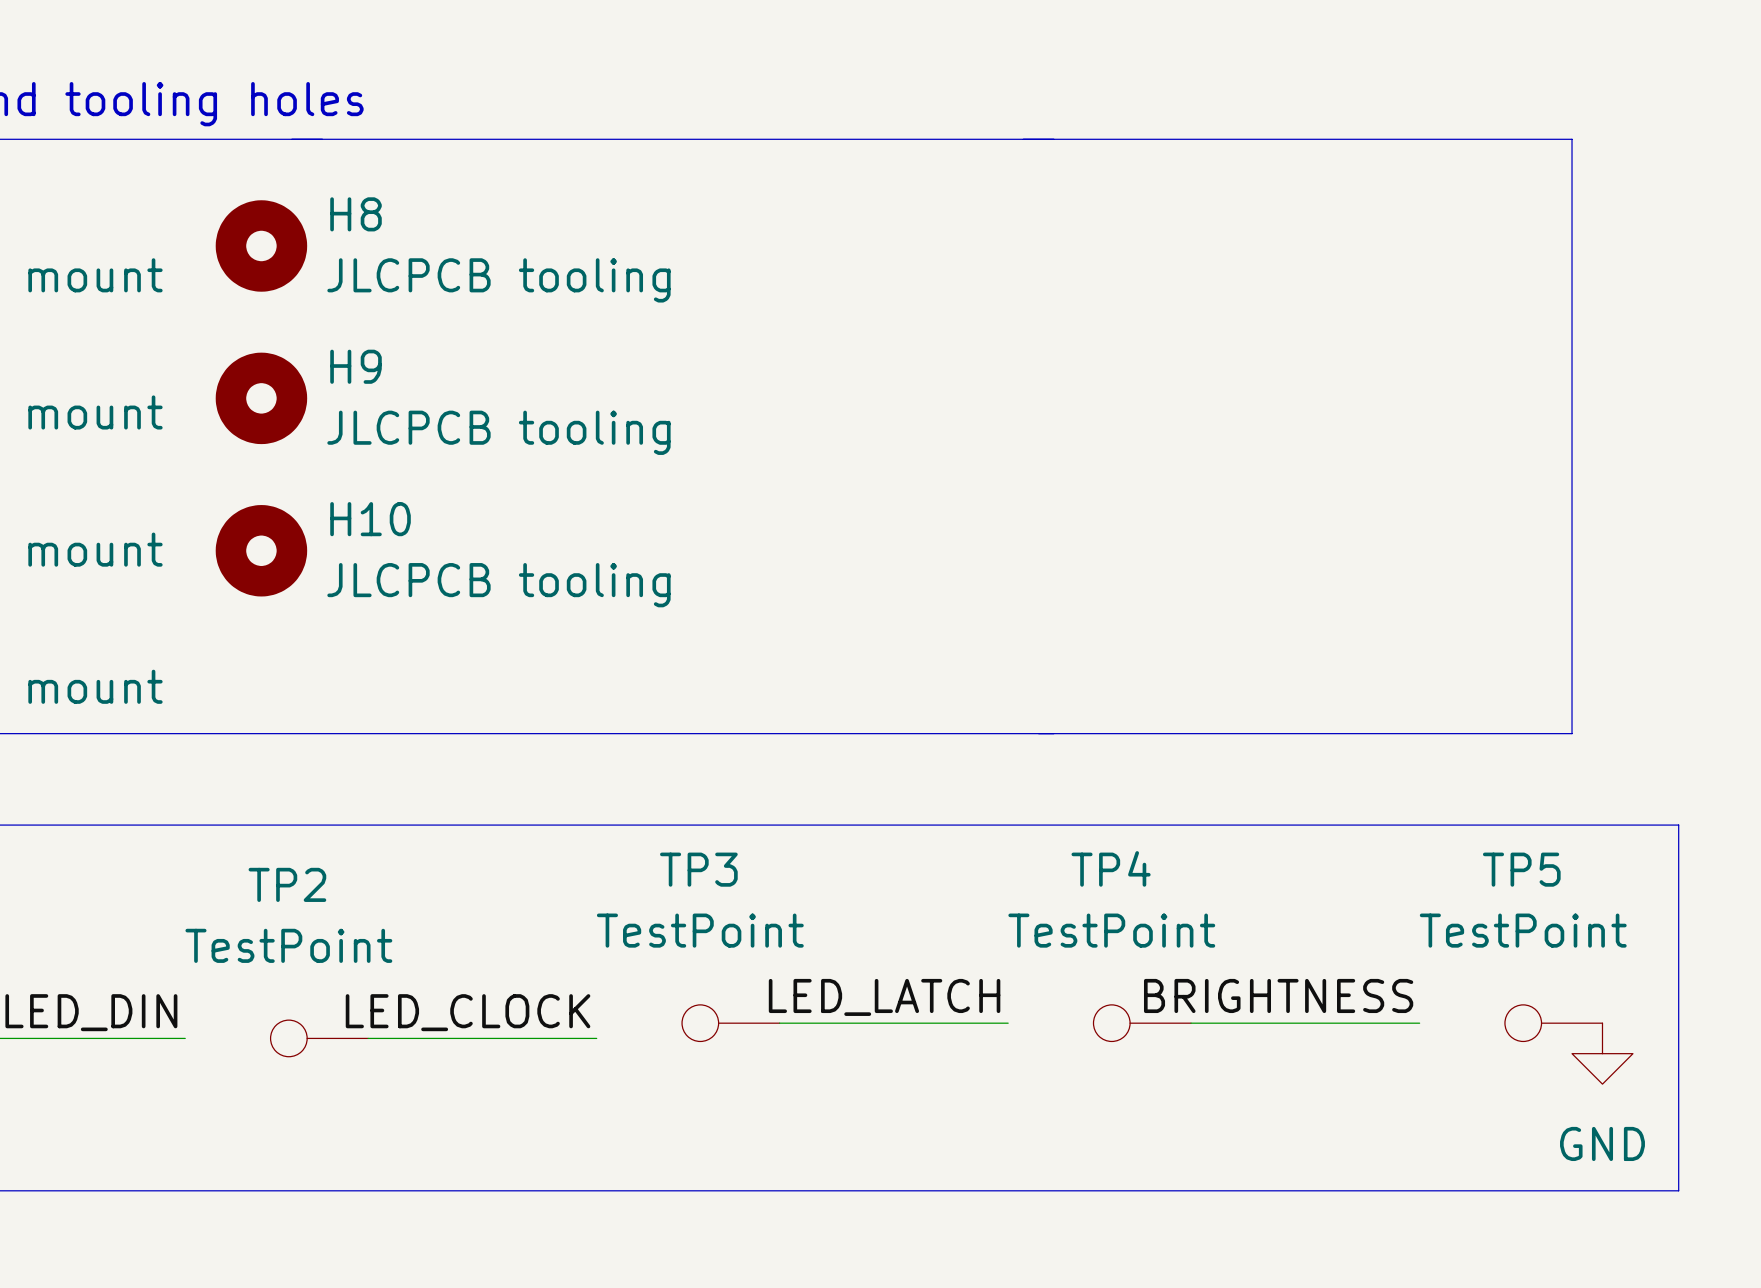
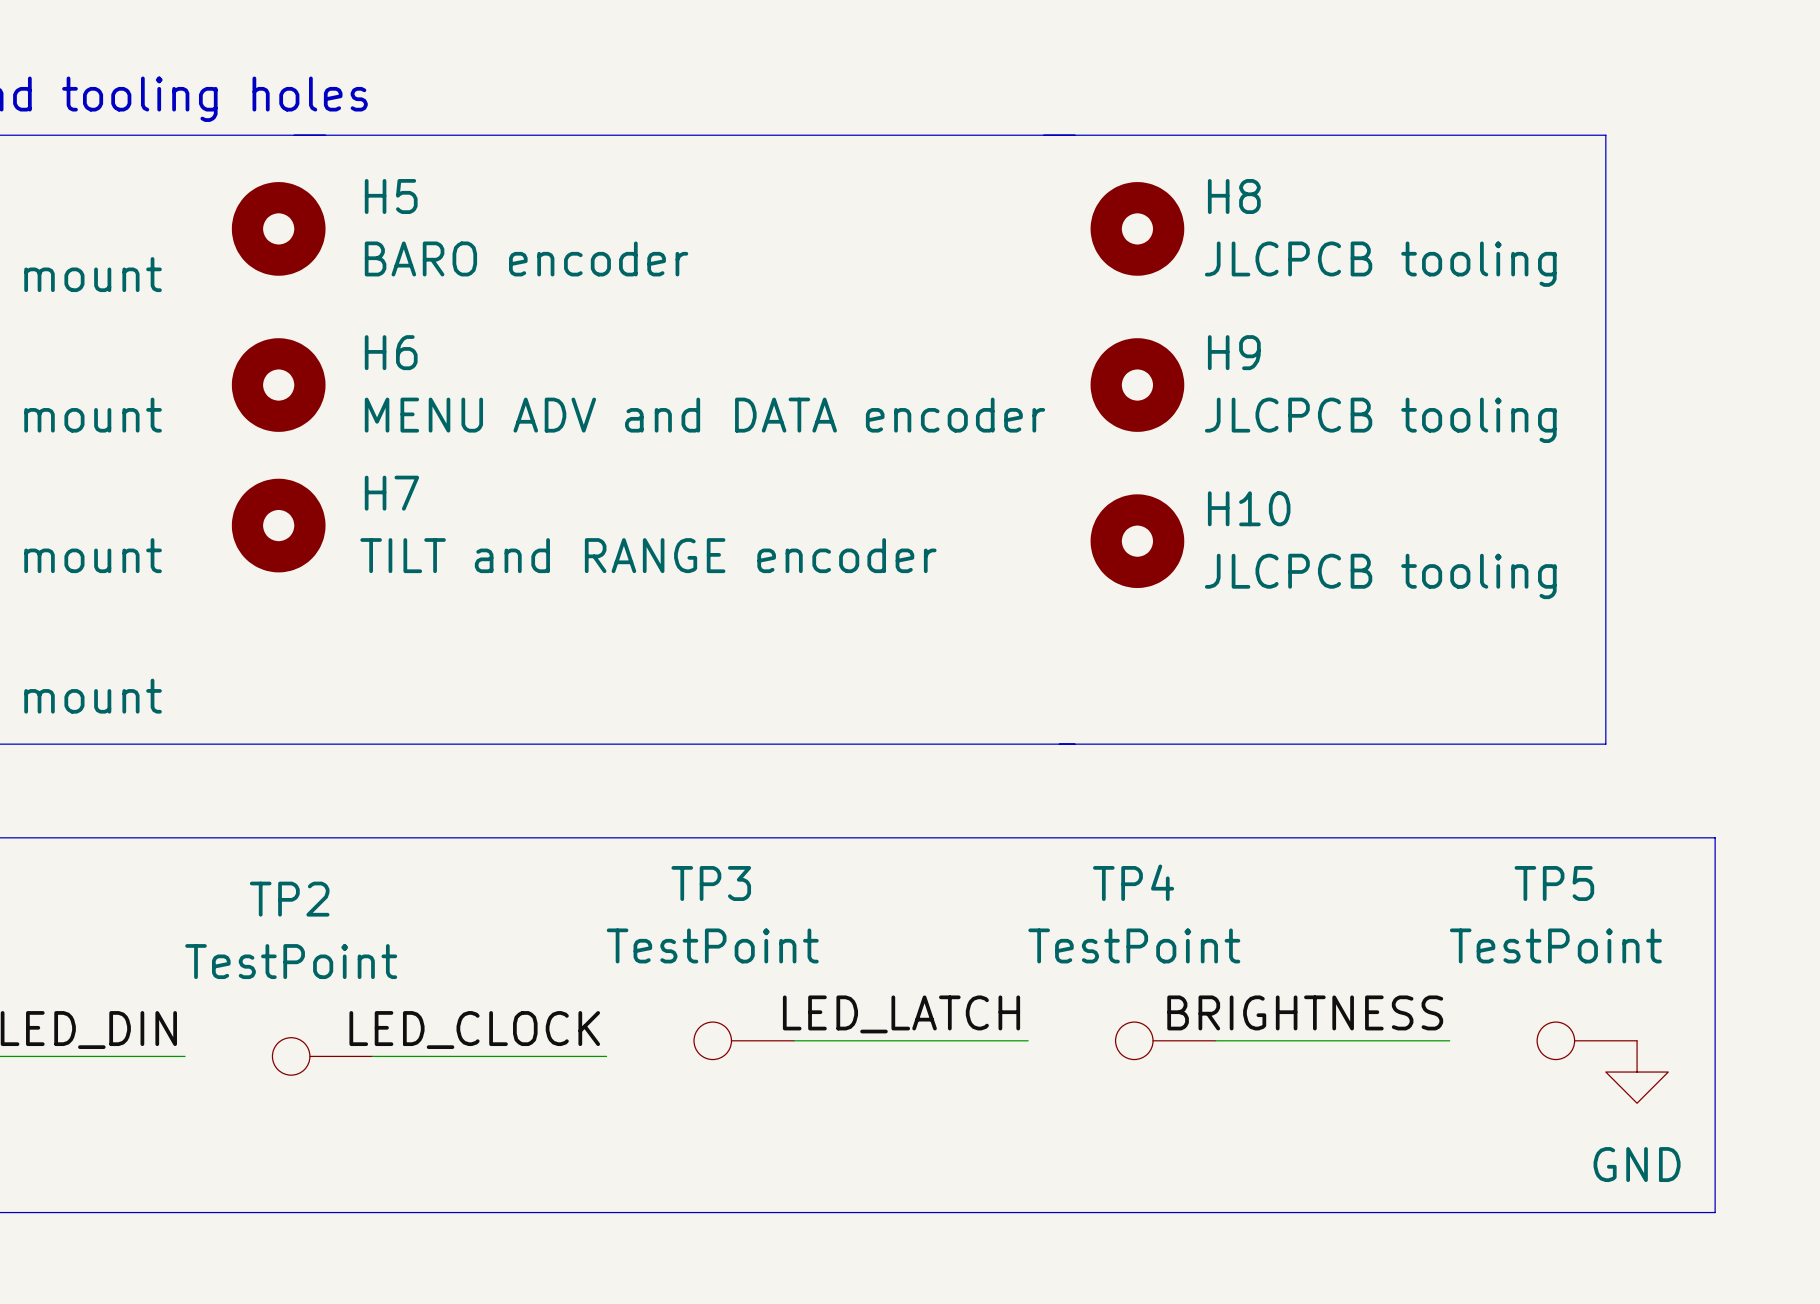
H5: none -> BARO encoder (278, 228)
H8 position: (261, 245) -> (1137, 228)
H6: none -> MENU ADV and DATA encoder (278, 385)
H9 position: (261, 398) -> (1137, 385)
H7: none -> TILT and RANGE encoder (278, 525)
H10 position: (261, 550) -> (1137, 541)

